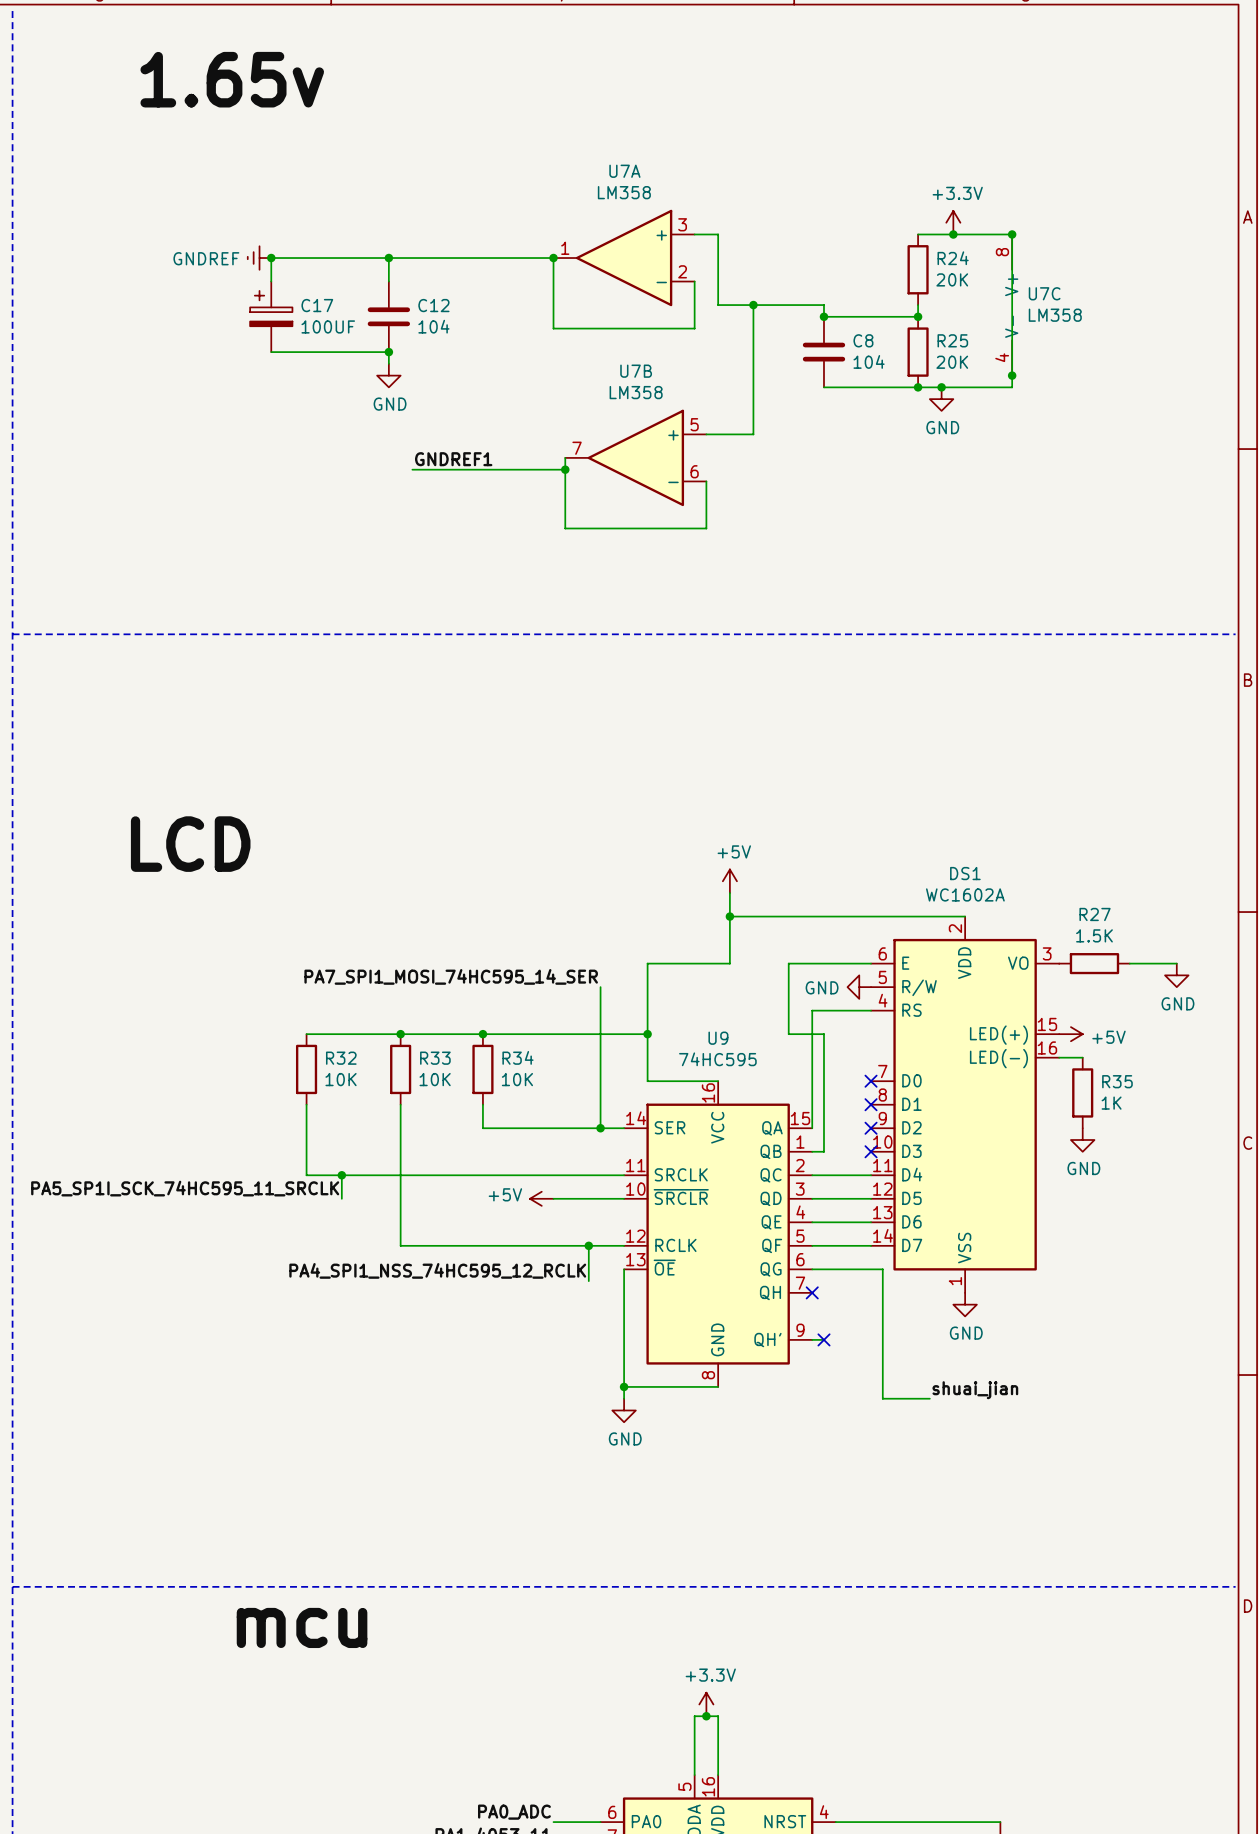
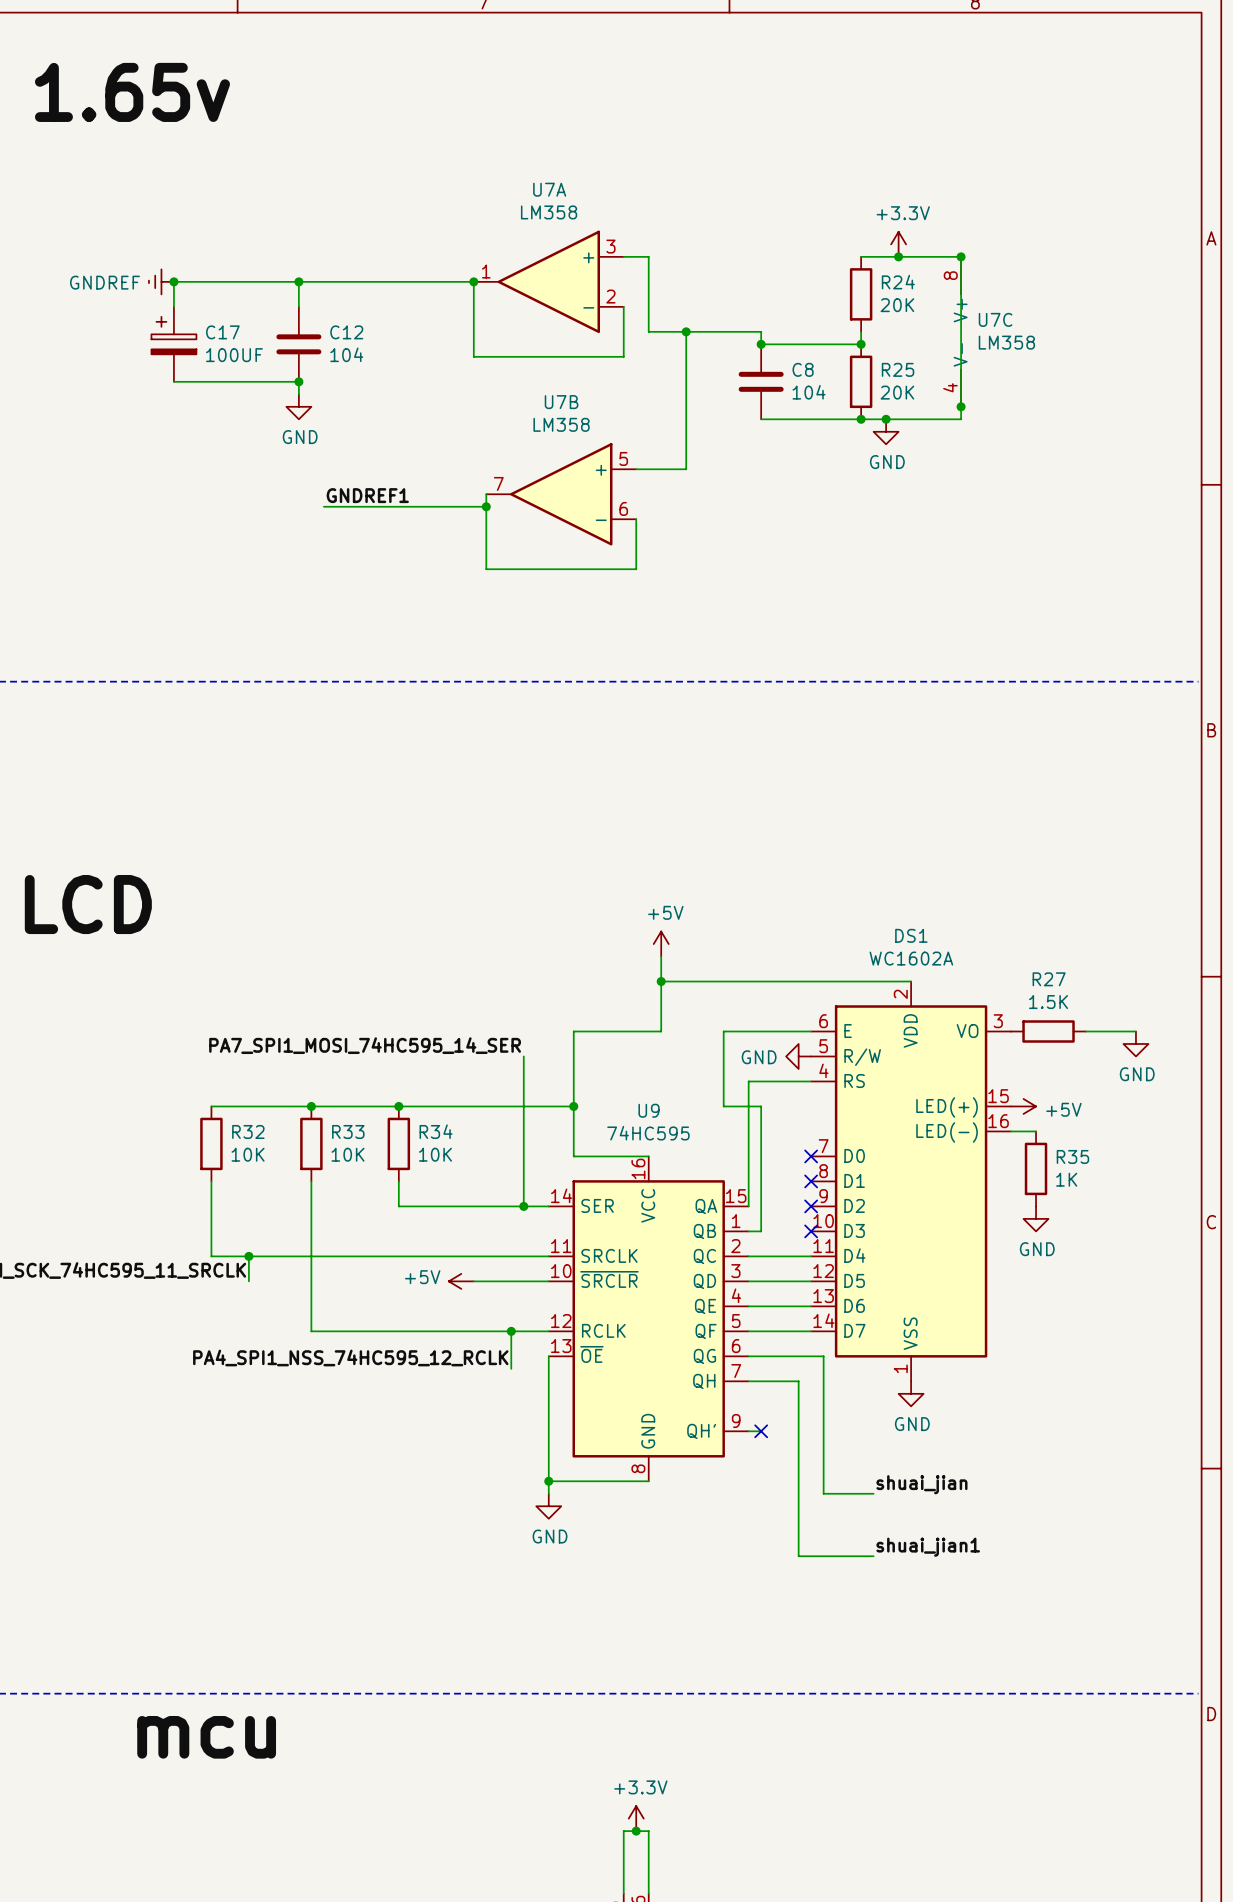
wire: none -> (748, 1381) (798, 1381) (798, 1556) (873, 1556)
no-connect mark: (812, 1292) -> none
label: none -> shuai_jian1 (928, 1547)

